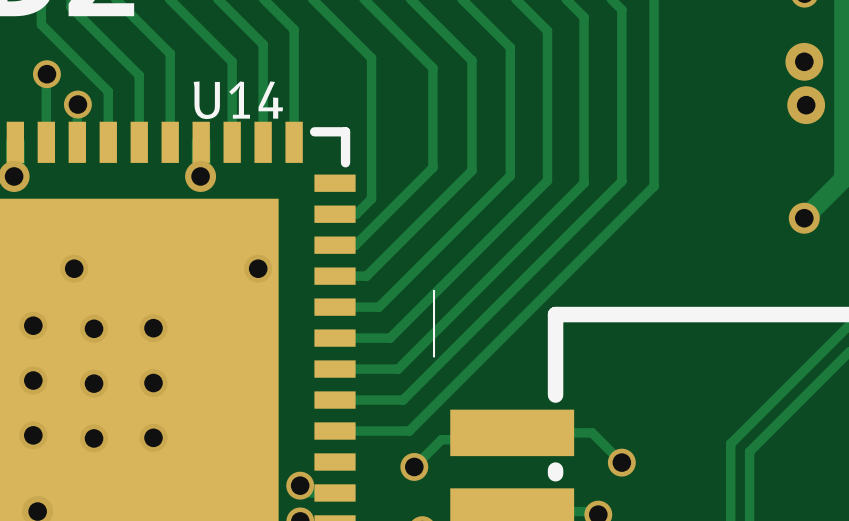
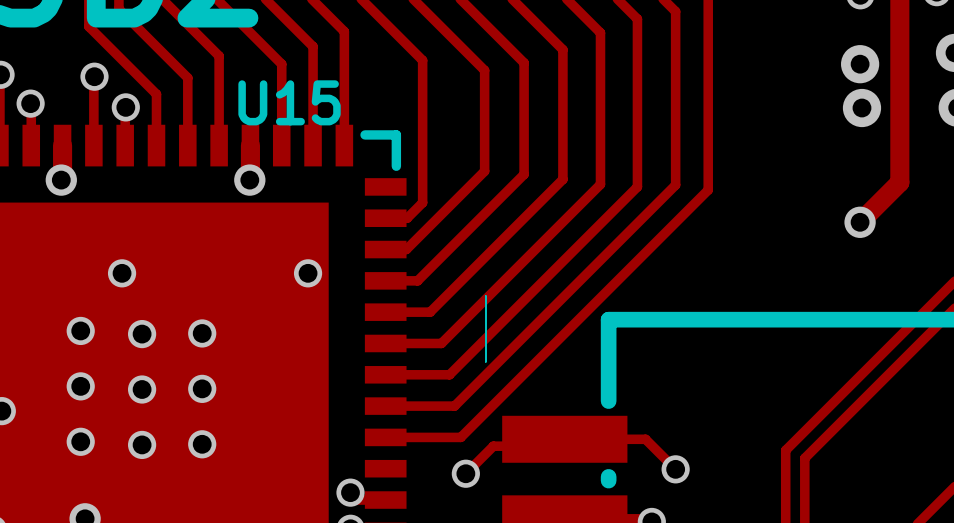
U14 name: U14 (238, 100) -> U15 (289, 102)

